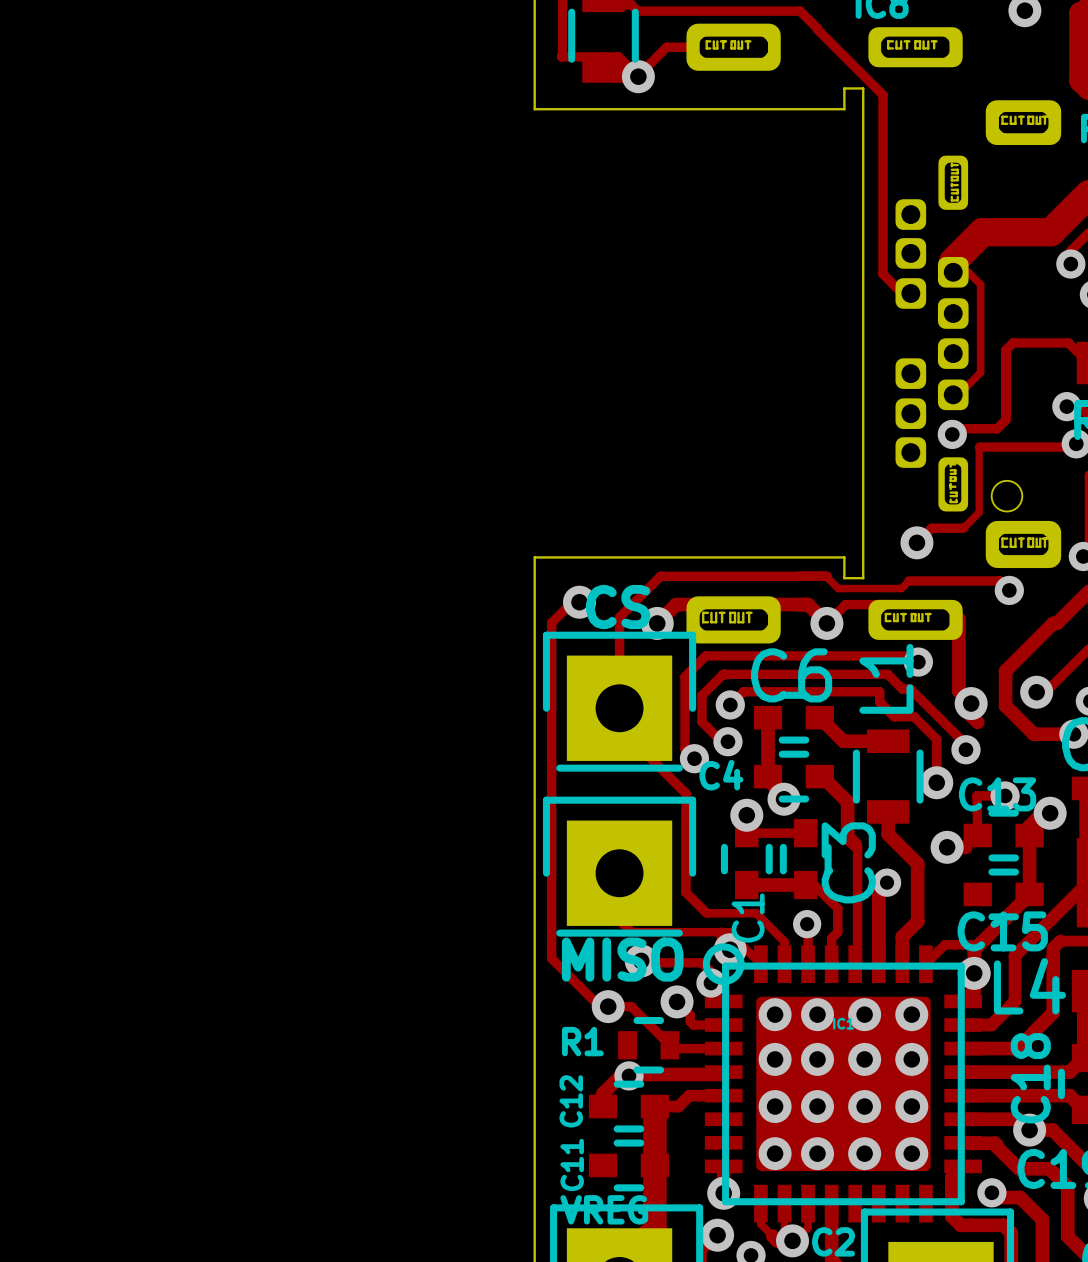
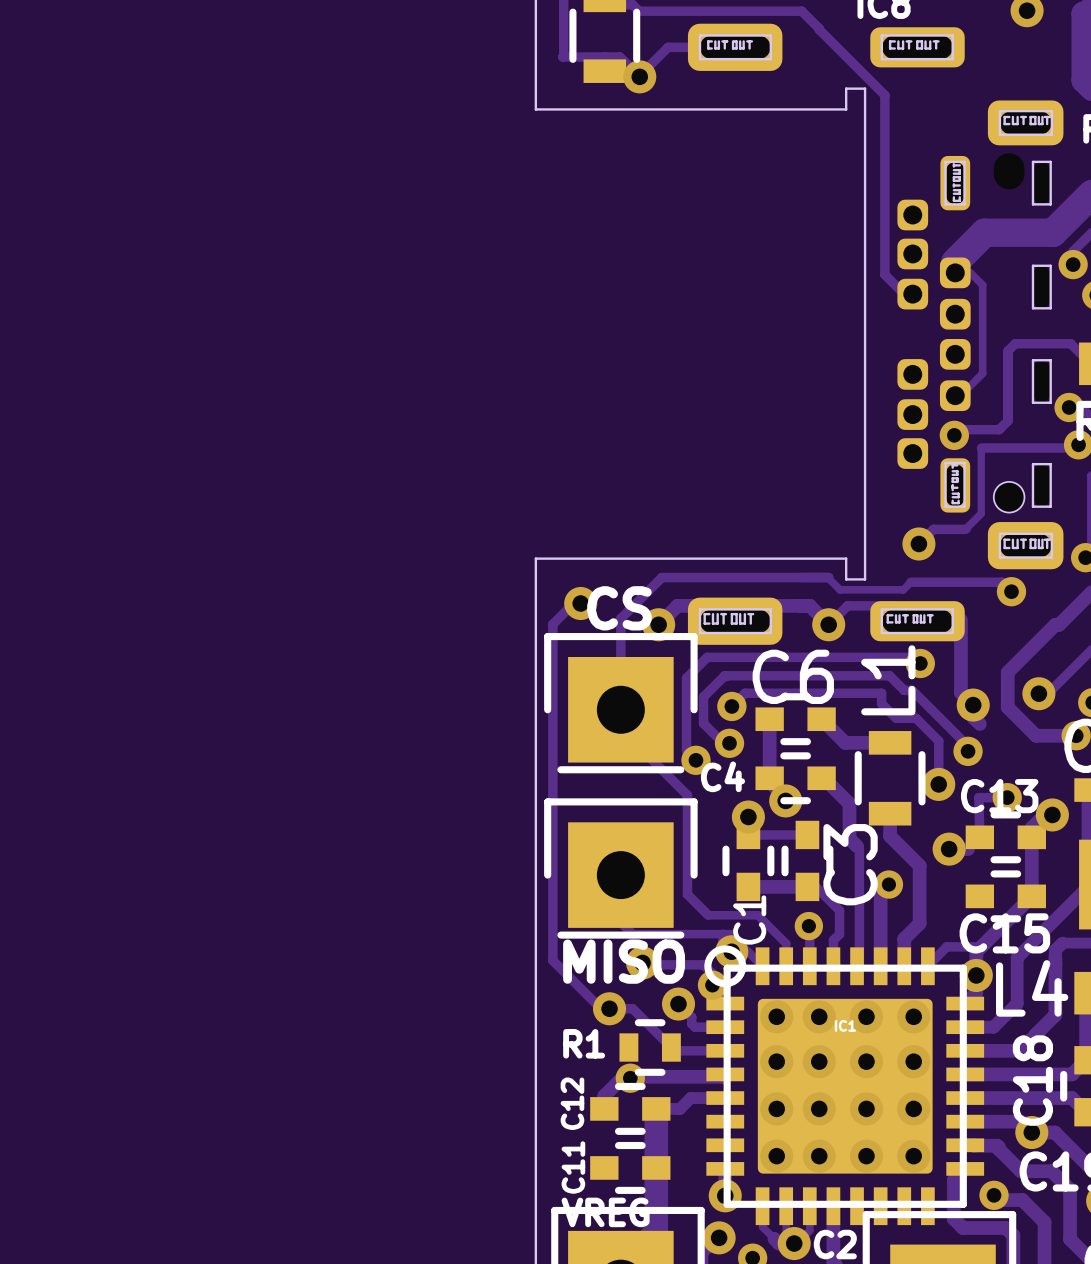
board edge: none -> (1032, 161) (1032, 204) (1050, 204) (1050, 161) (1032, 161)
board edge: none -> (1032, 265) (1032, 308) (1050, 308) (1050, 265) (1032, 265)
board edge: none -> (1032, 360) (1032, 402) (1050, 402) (1050, 360) (1032, 360)
board edge: none -> (1032, 464) (1032, 506) (1050, 506) (1050, 464) (1032, 464)

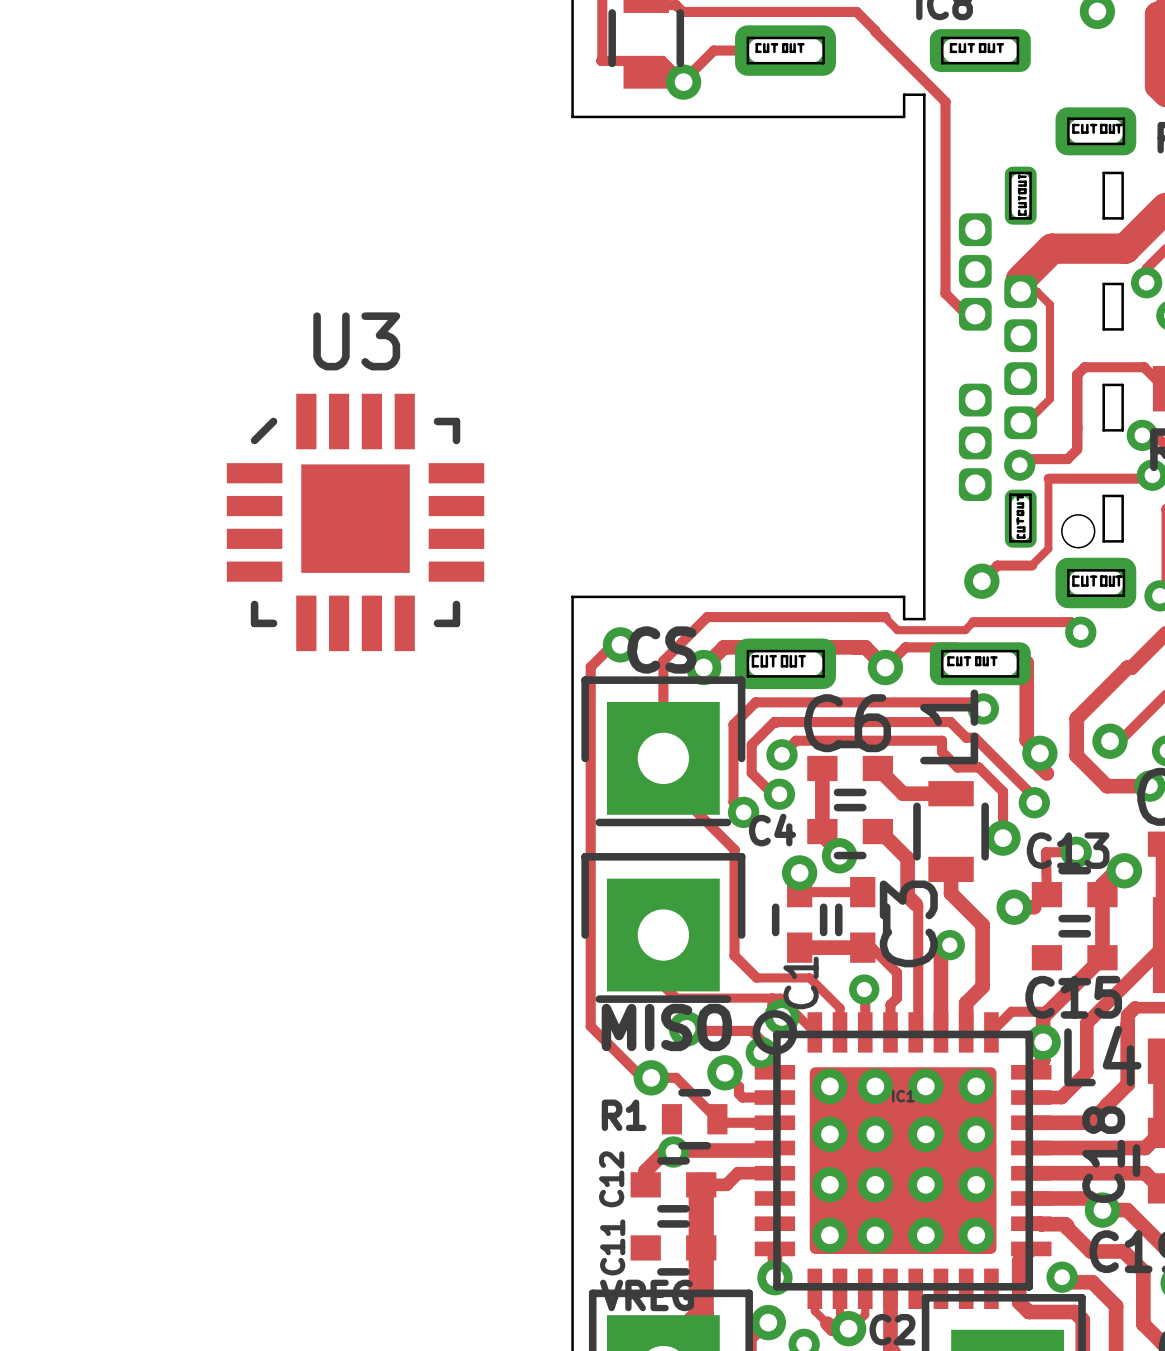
U3: none -> (355, 522)

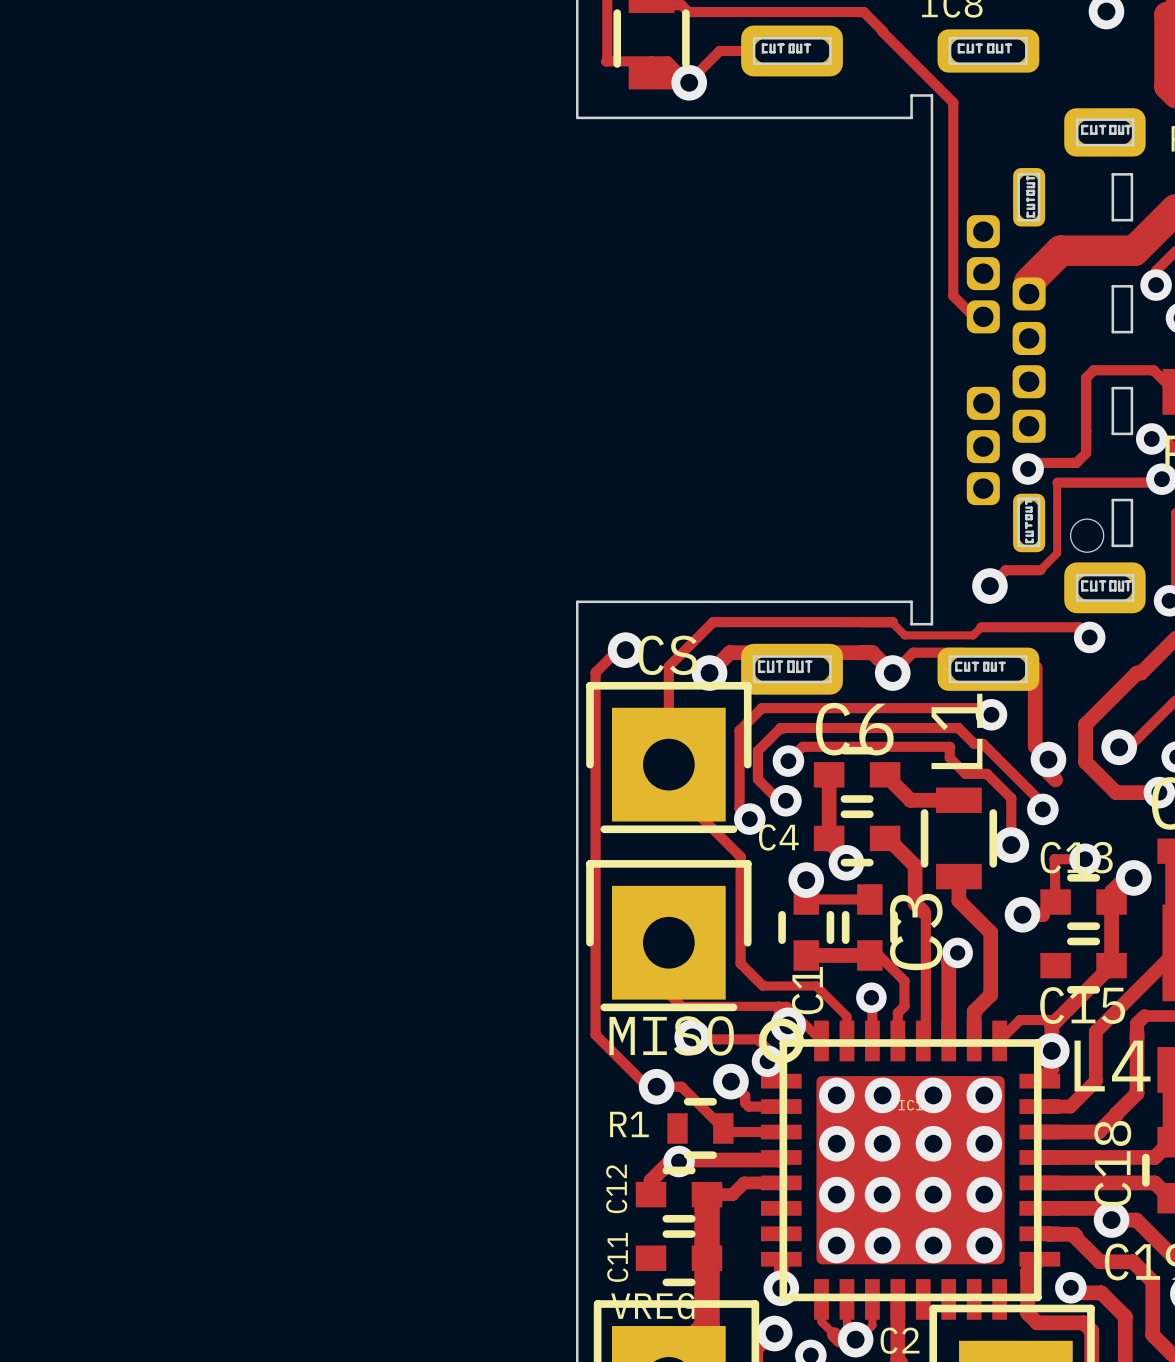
track: (1020, 291) (1036, 291) (1049, 304) (1049, 399) (1026, 422) -> none
U3: (355, 522) -> none

